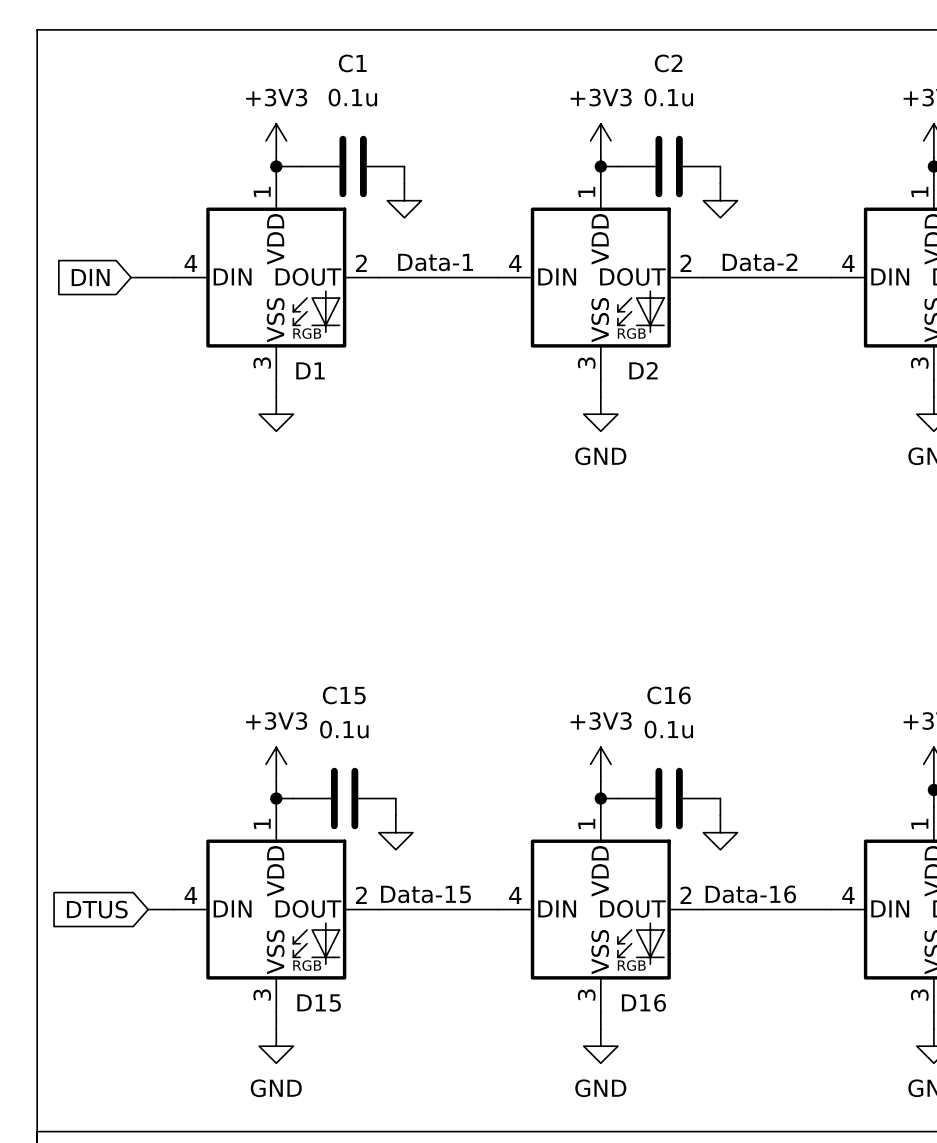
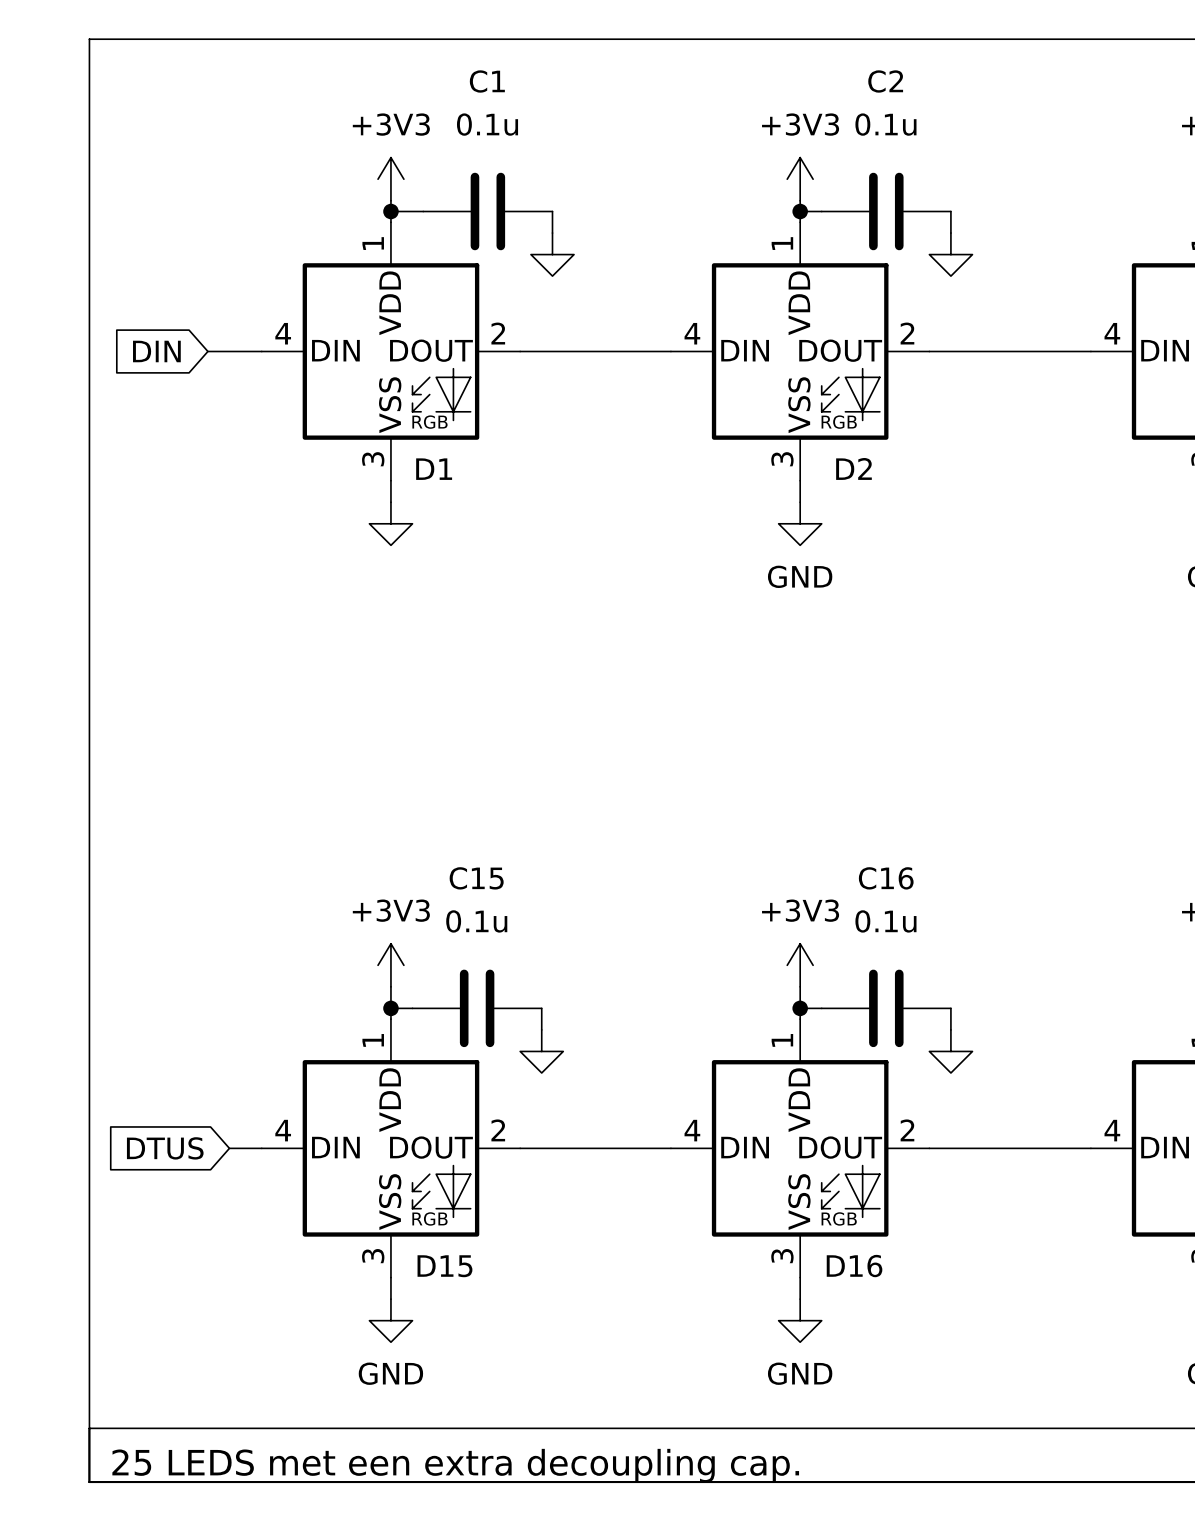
label: Data-1 (435, 262) -> none
label: Data-2 (760, 262) -> none
label: Data-15 (426, 894) -> none
label: Data-16 (750, 894) -> none

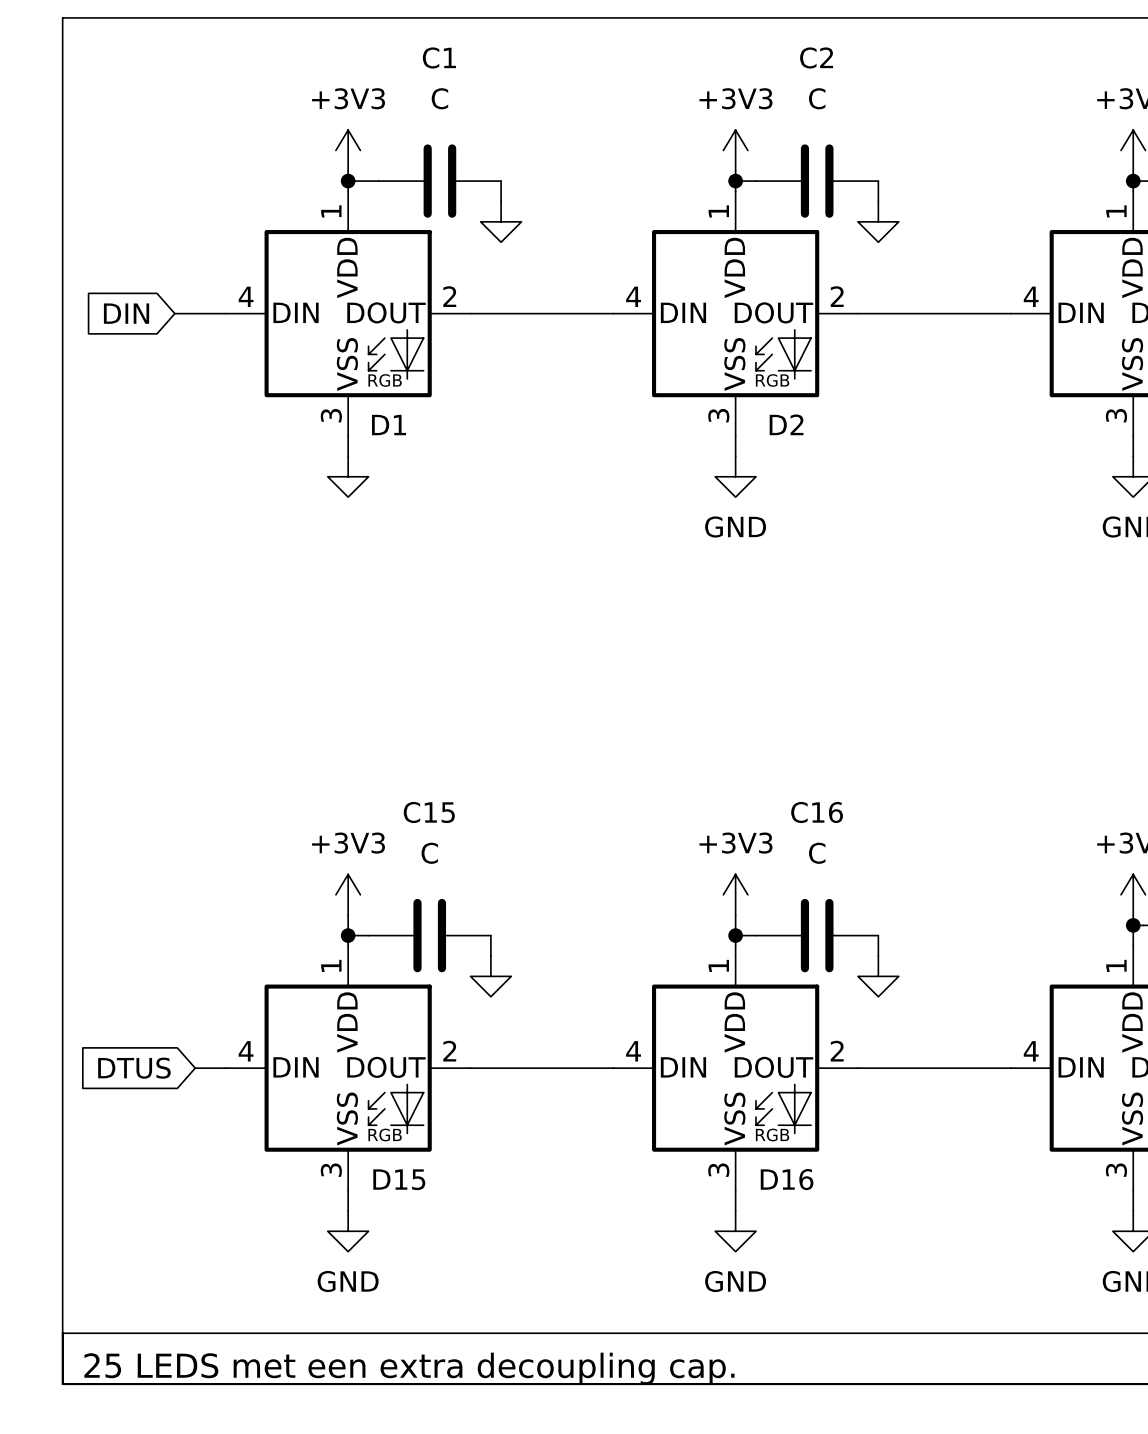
C1 value: 0.1u (487, 124) -> C (439, 98)
C2 value: 0.1u (885, 124) -> C (817, 98)
C15 value: 0.1u (476, 921) -> C (429, 853)
C16 value: 0.1u (885, 921) -> C (817, 853)

